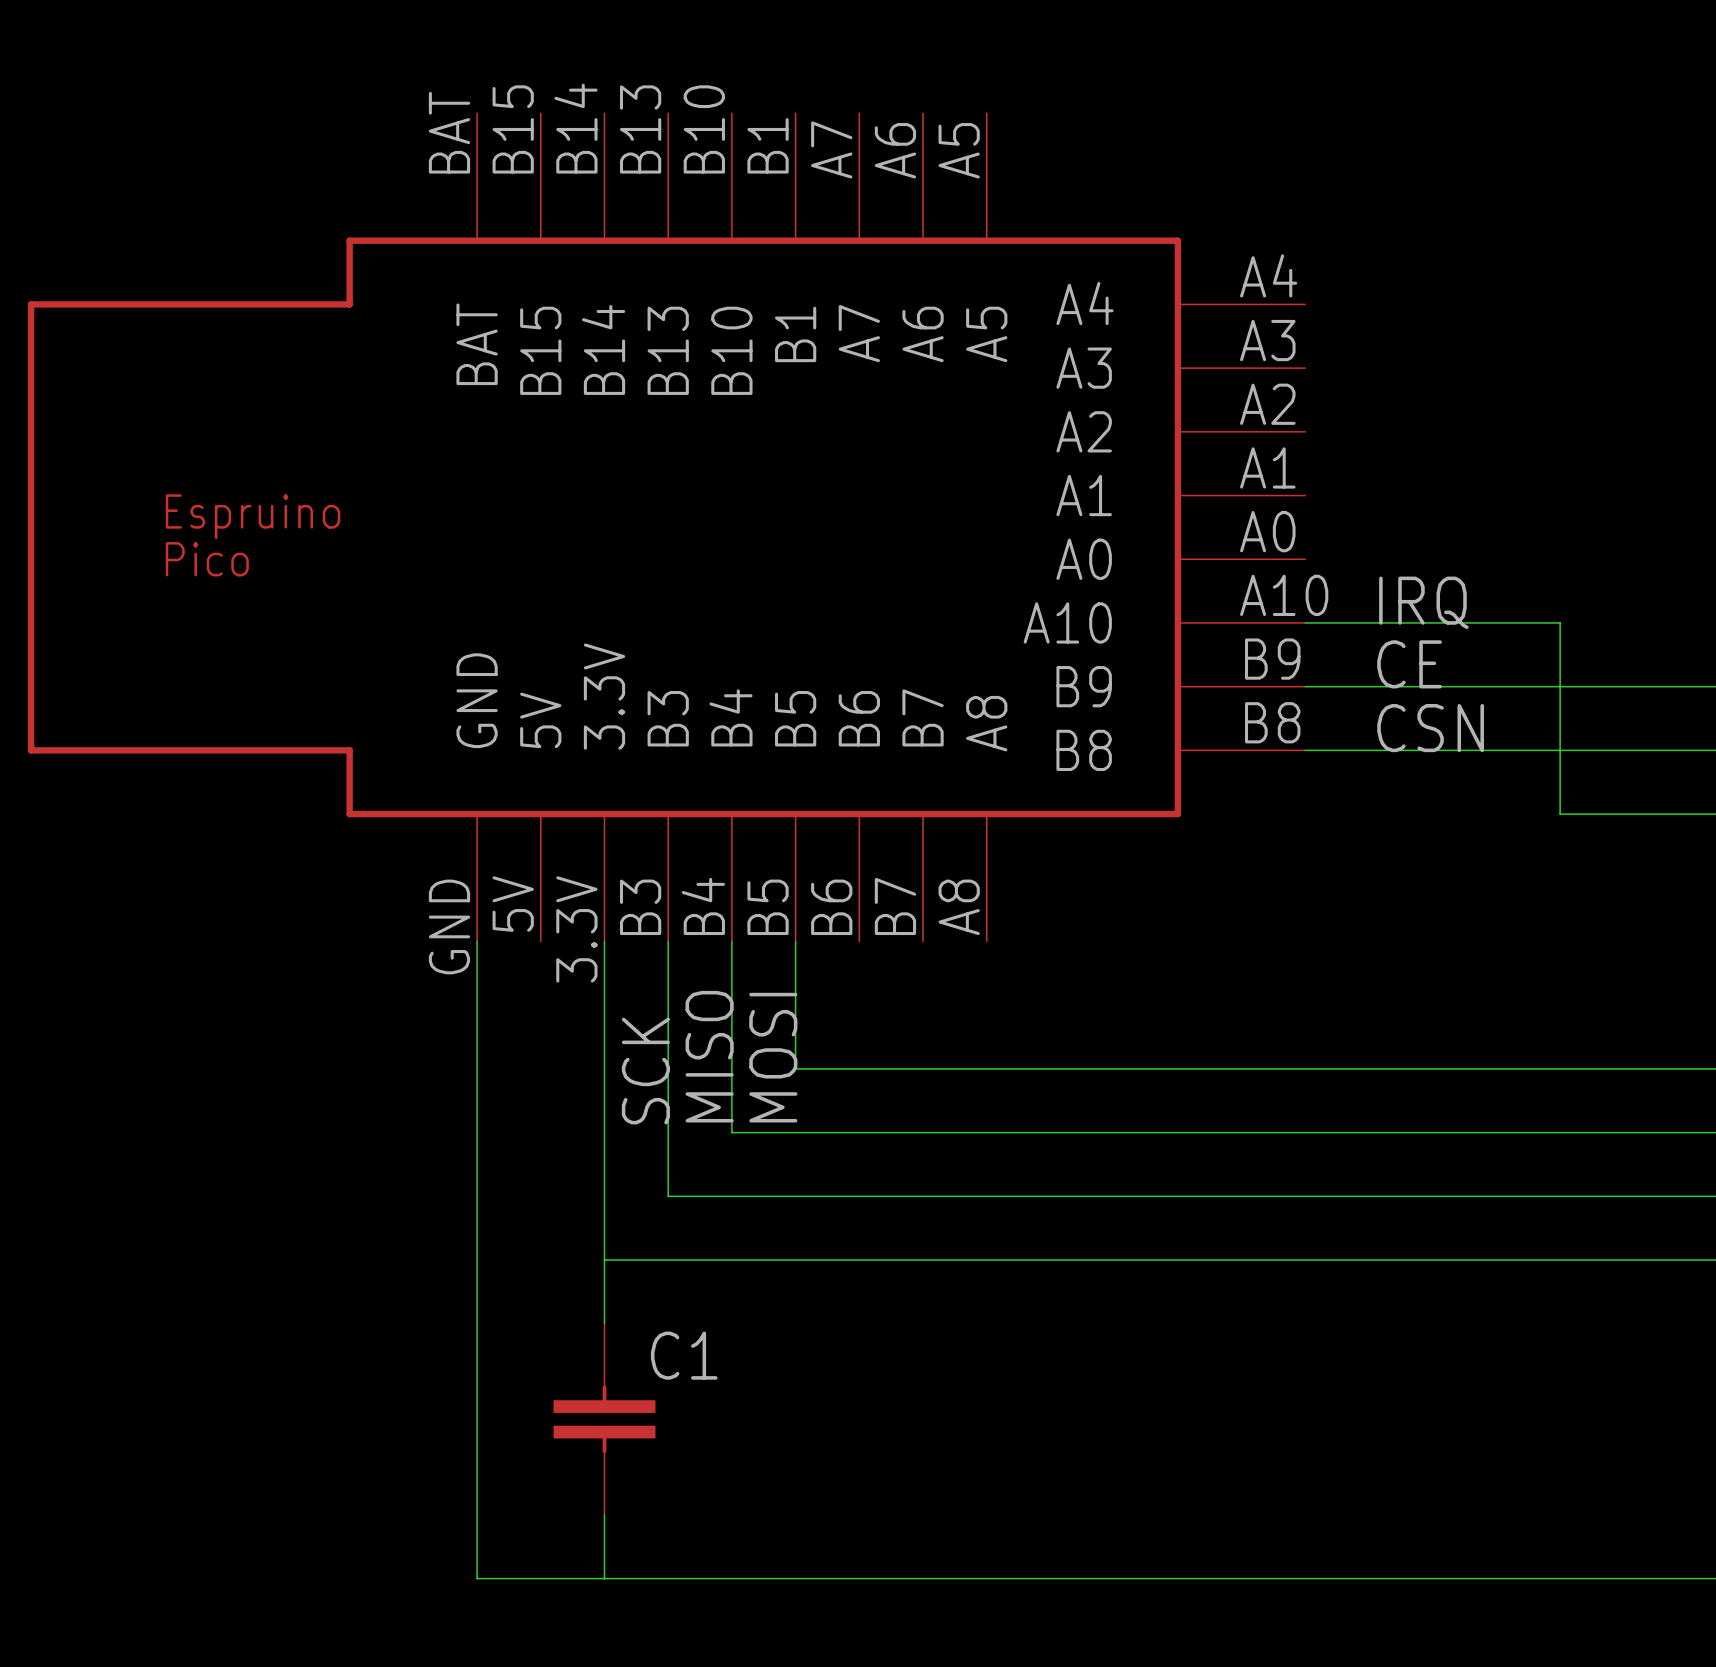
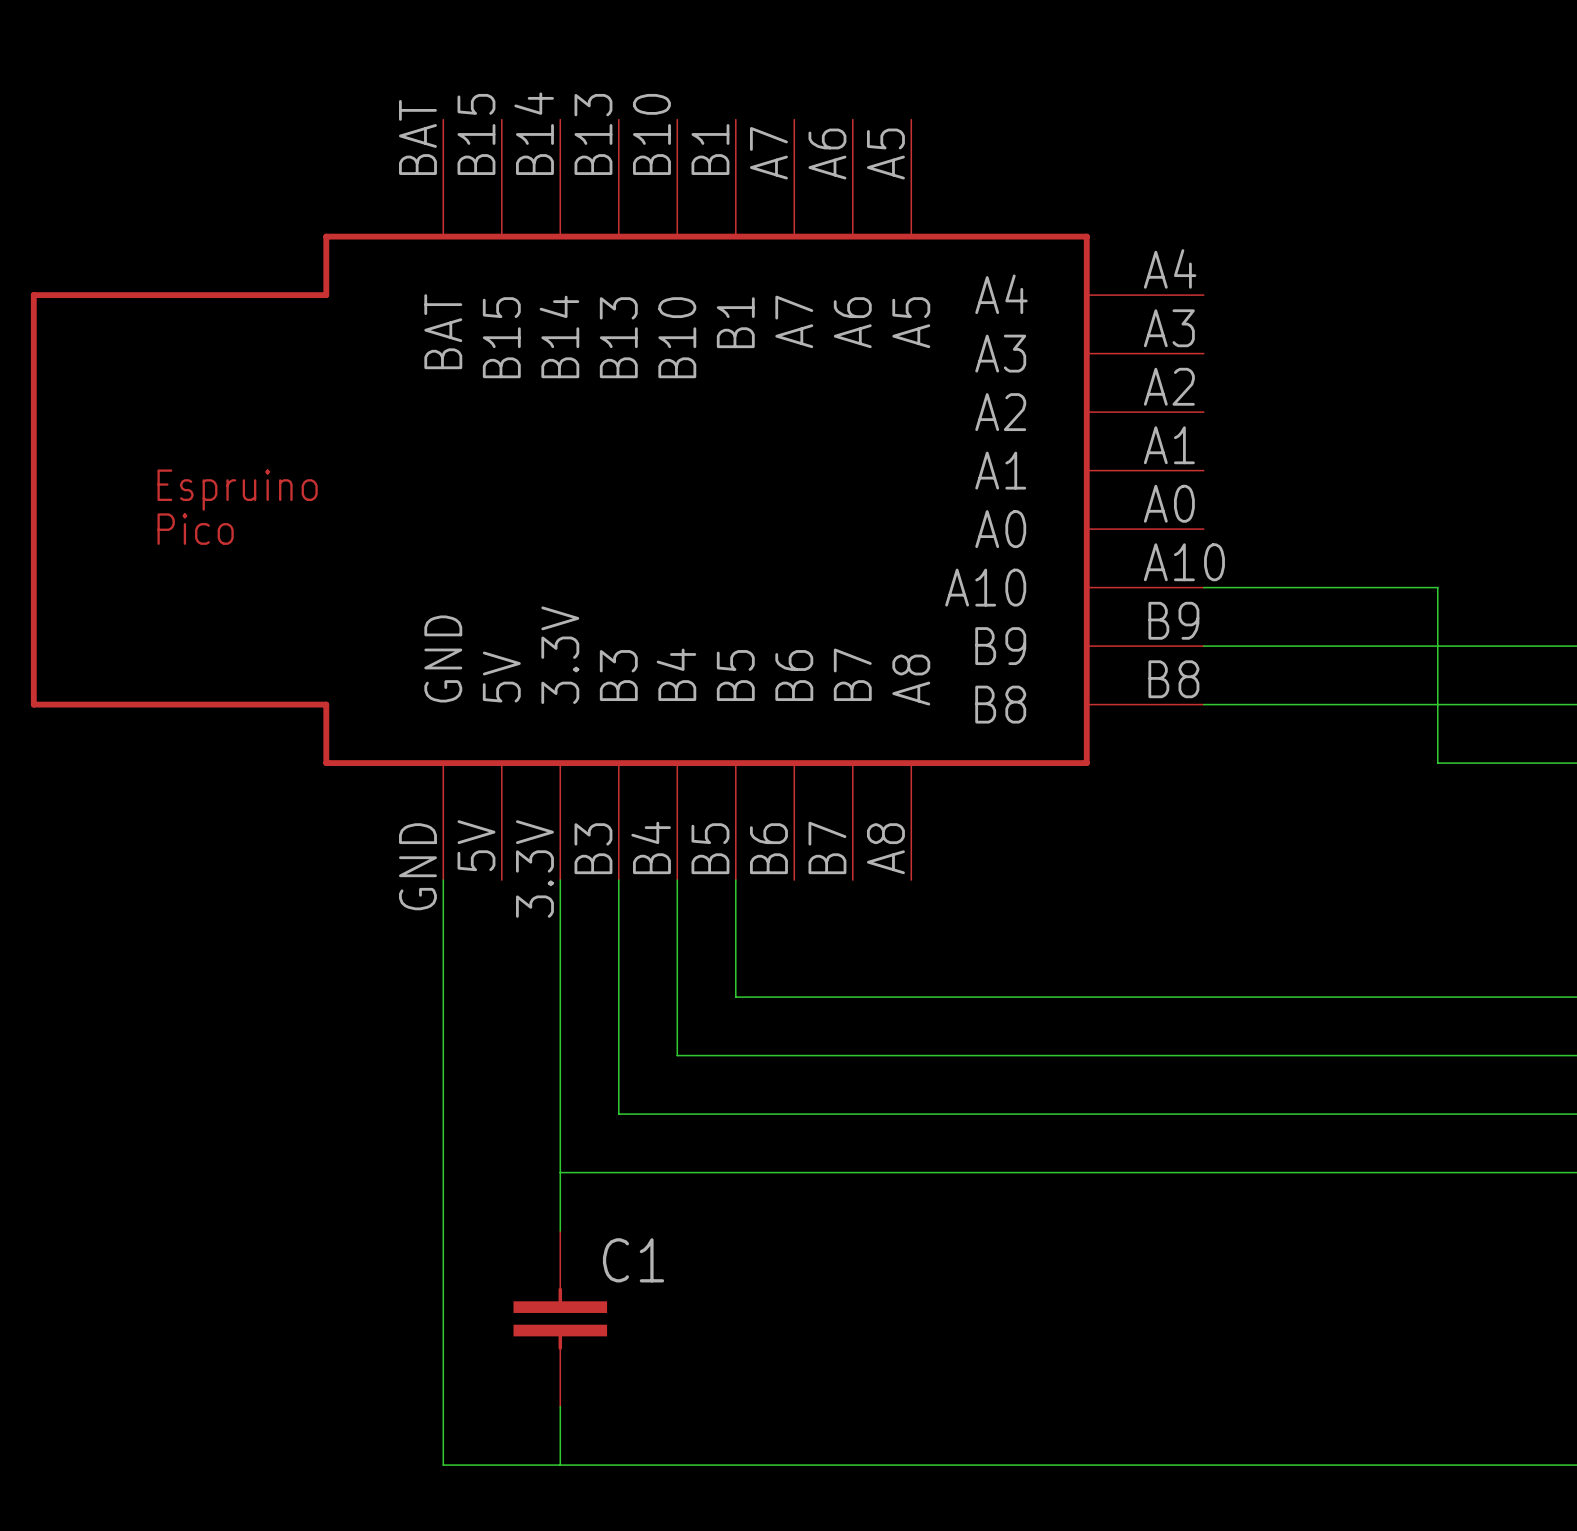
label: IRQ (1423, 602) -> none
label: CE (1409, 664) -> none
label: CSN (1430, 728) -> none
label: MISO (709, 1056) -> none
label: MOSI (773, 1057) -> none
label: SCK (645, 1071) -> none

